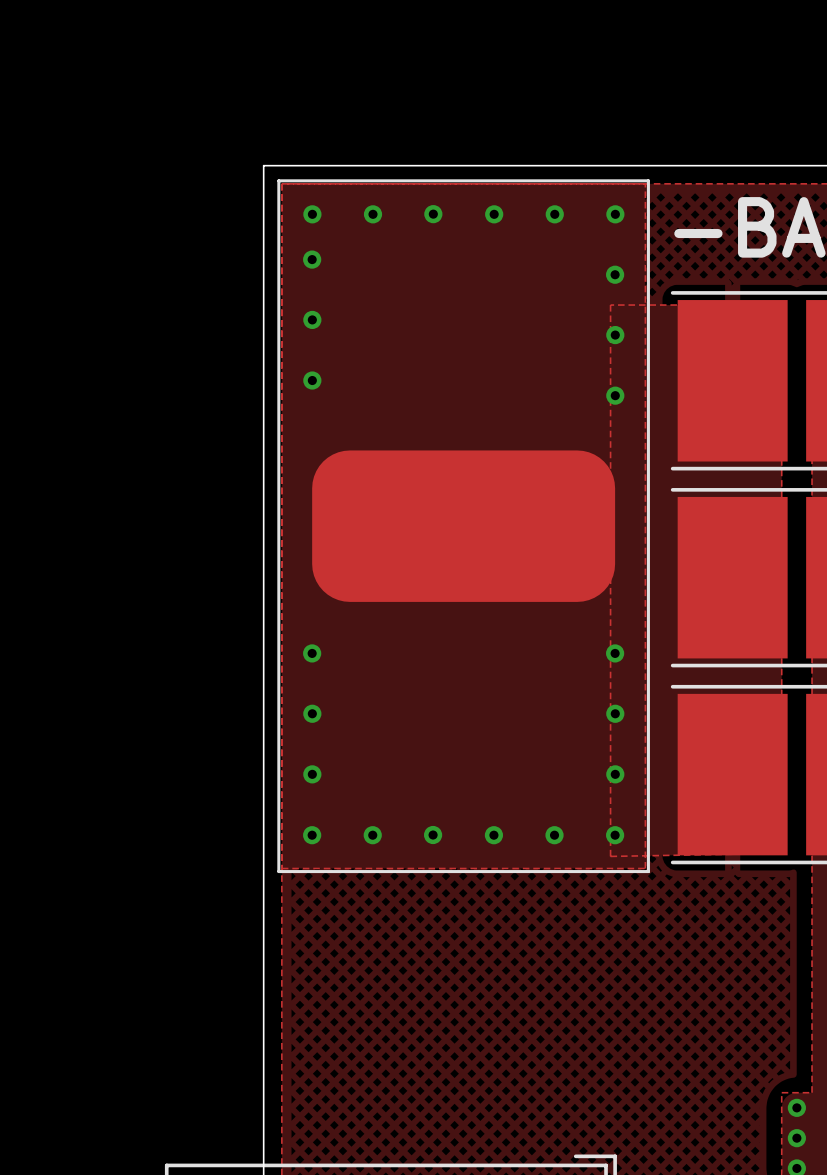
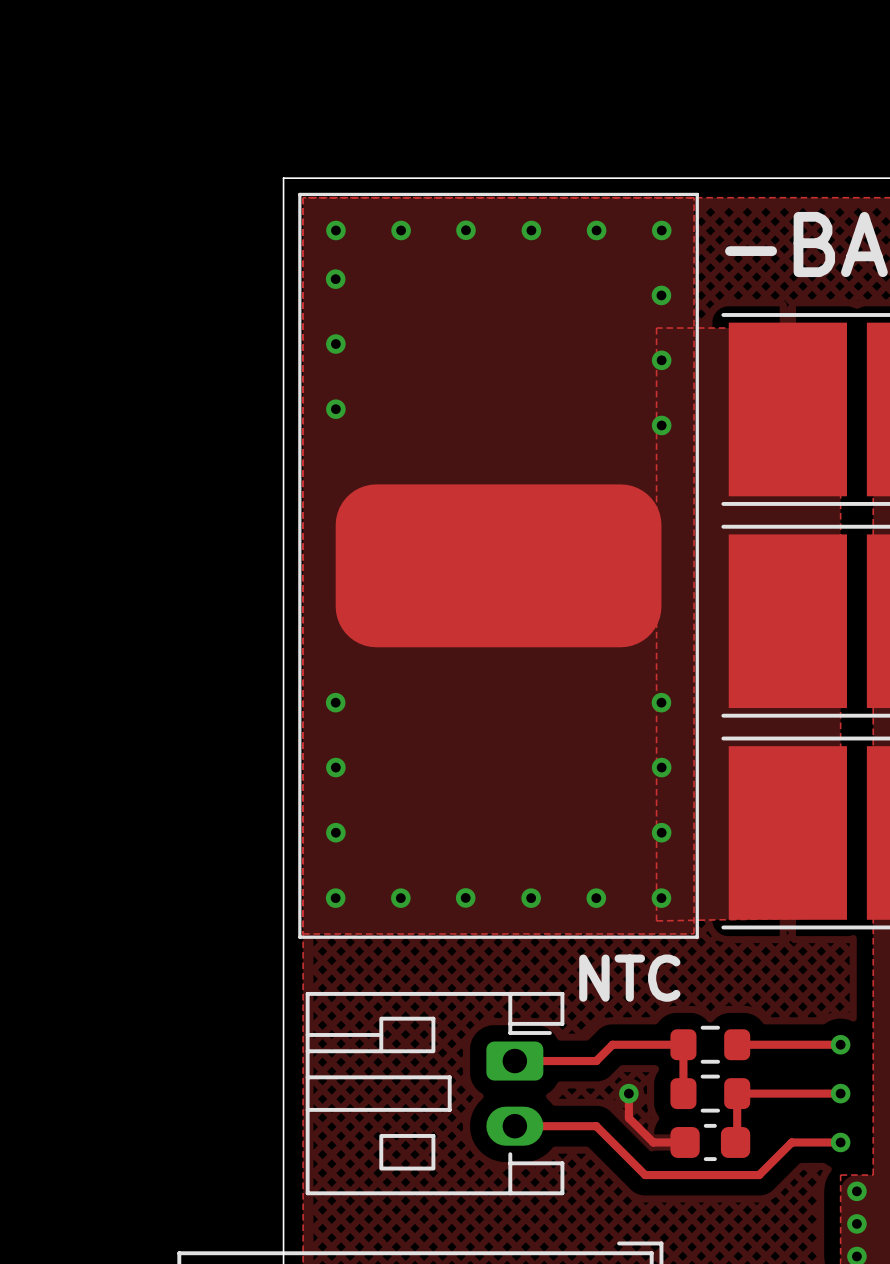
text: none -> NTC (629, 978)
part: none -> (710, 1044)
track: none -> (737, 1044) (840, 1044)
via: none -> (840, 1044)
track: none -> (514, 1061) (596, 1061) (612, 1044) (683, 1044) (683, 1093)
part: none -> (435, 1093)
track: none -> (628, 1093) (628, 1118) (653, 1142) (685, 1142)
via: none -> (628, 1093)
part: none -> (710, 1093)
track: none -> (840, 1093) (737, 1093) (737, 1140) (735, 1142)
via: none -> (840, 1093)
track: none -> (514, 1126) (596, 1126) (645, 1175) (759, 1175) (791, 1142) (840, 1142)
part: none -> (710, 1142)
via: none -> (840, 1142)

